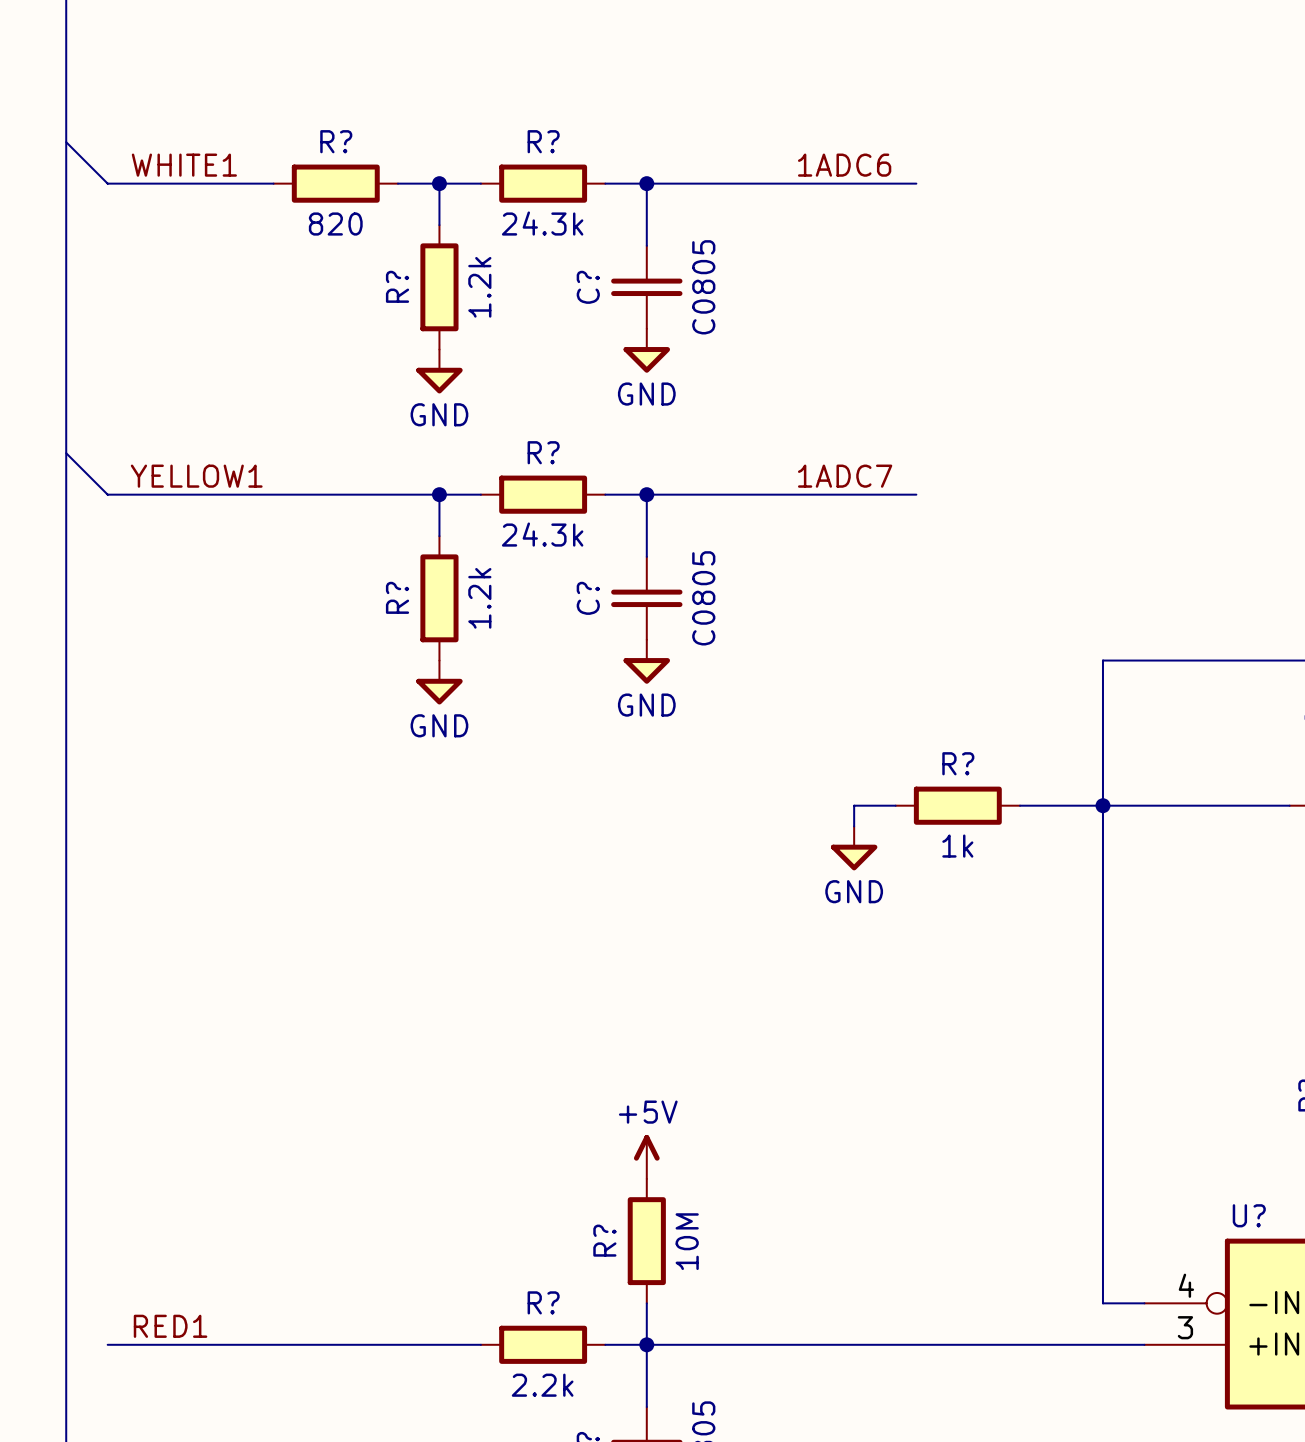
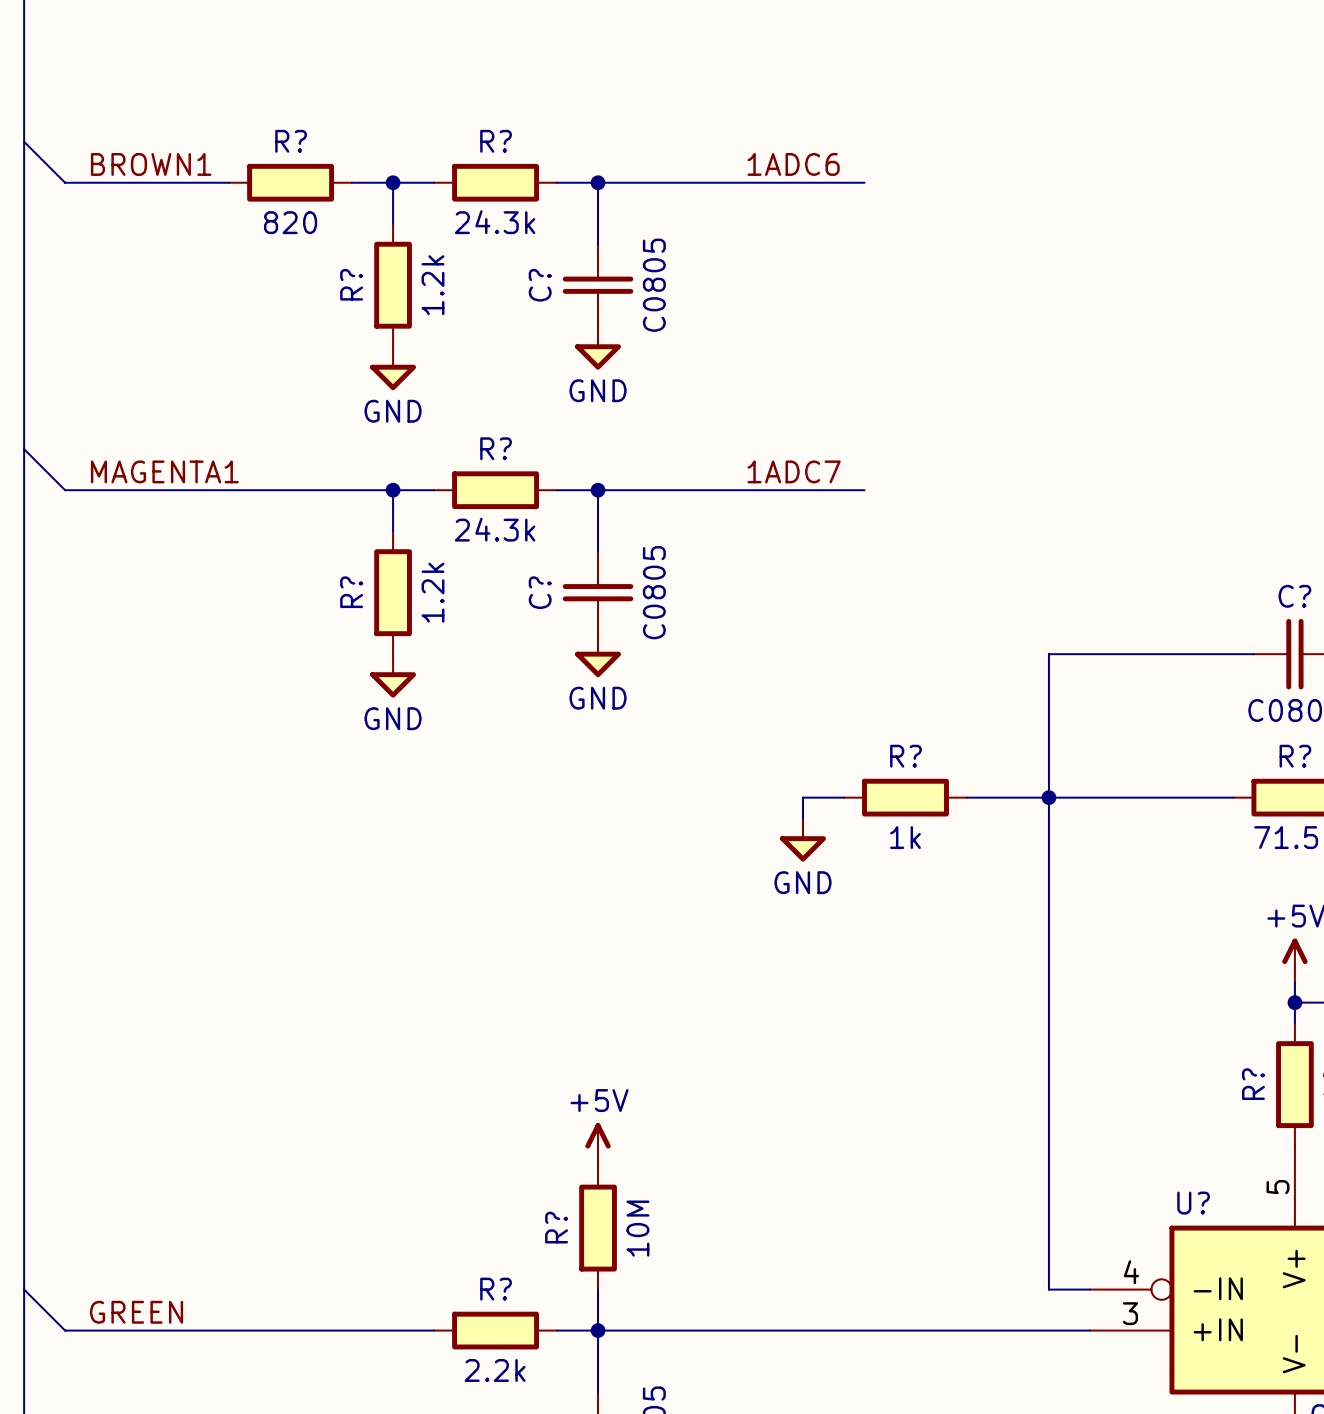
label: WHITE1 (184, 165) -> BROWN1 (151, 164)
label: YELLOW1 (196, 476) -> MAGENTA1 (164, 471)
wire: none -> (24, 1289) (65, 1330)
label: RED1 (170, 1326) -> GREEN (136, 1312)

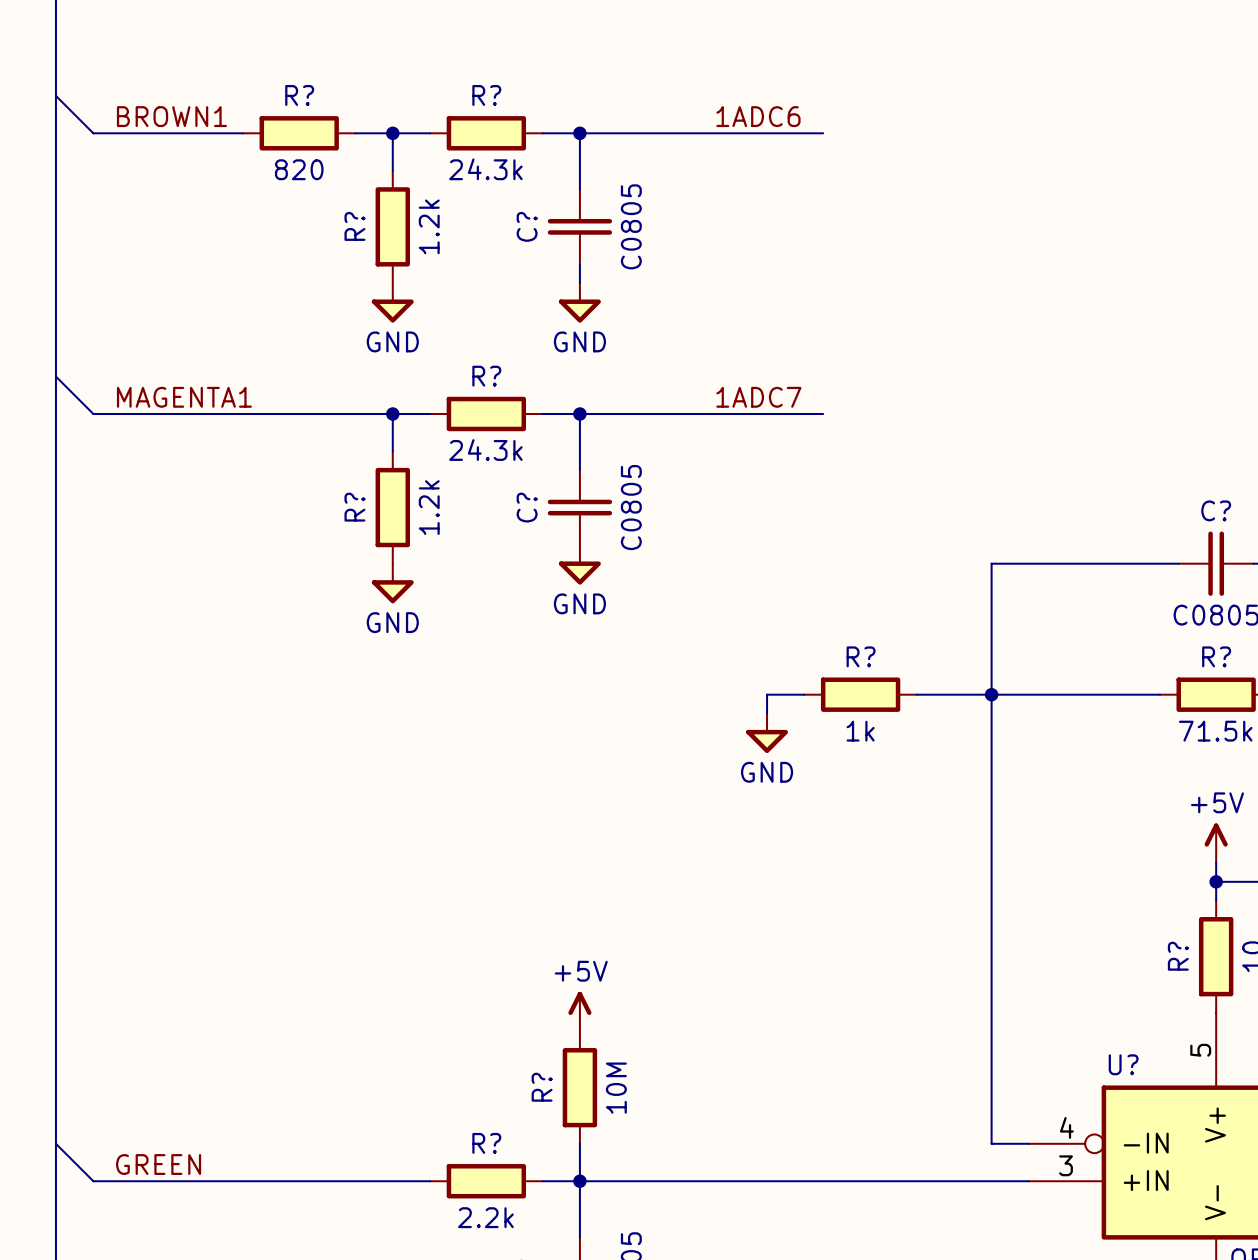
power symbol position: GND (598, 347) -> GND (579, 302)

